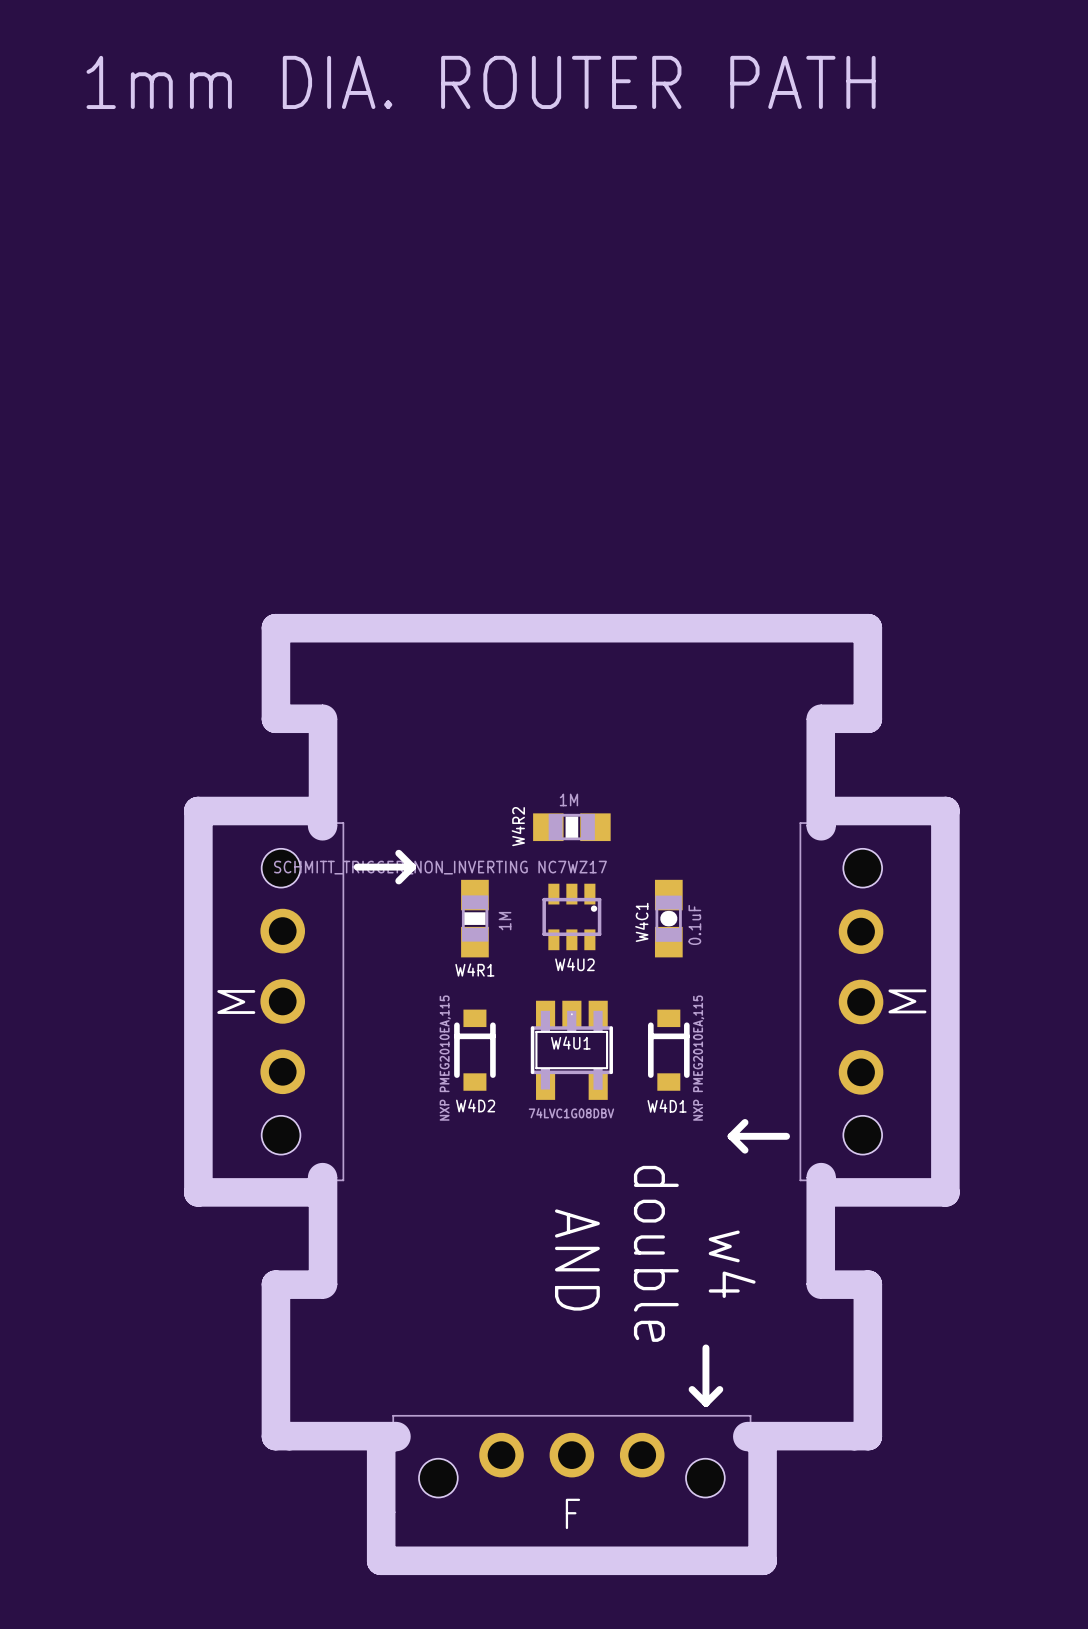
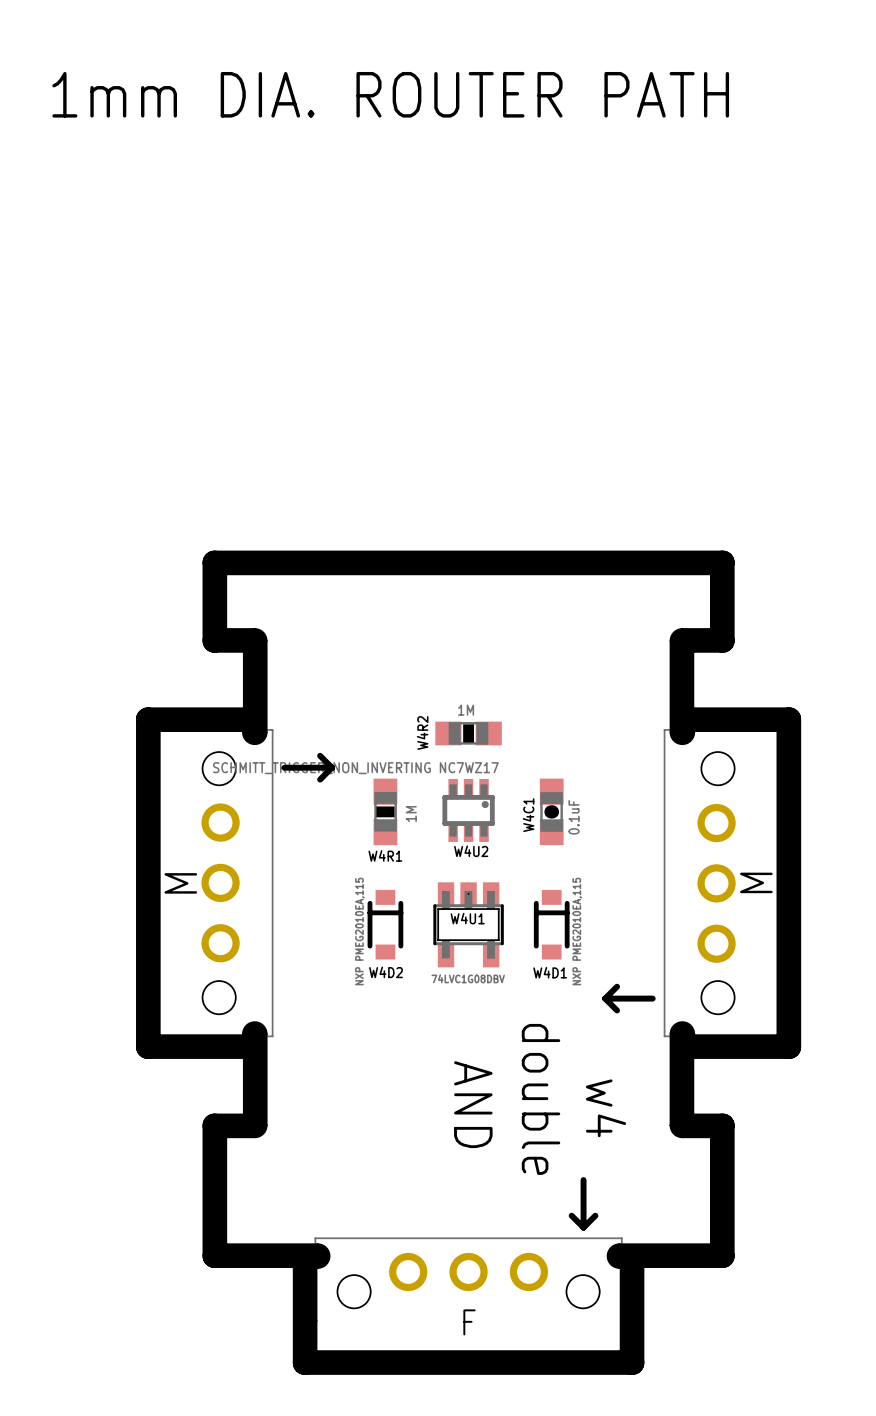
W4U2 footprint: [542, 883, 602, 951] -> [442, 778, 495, 842]

